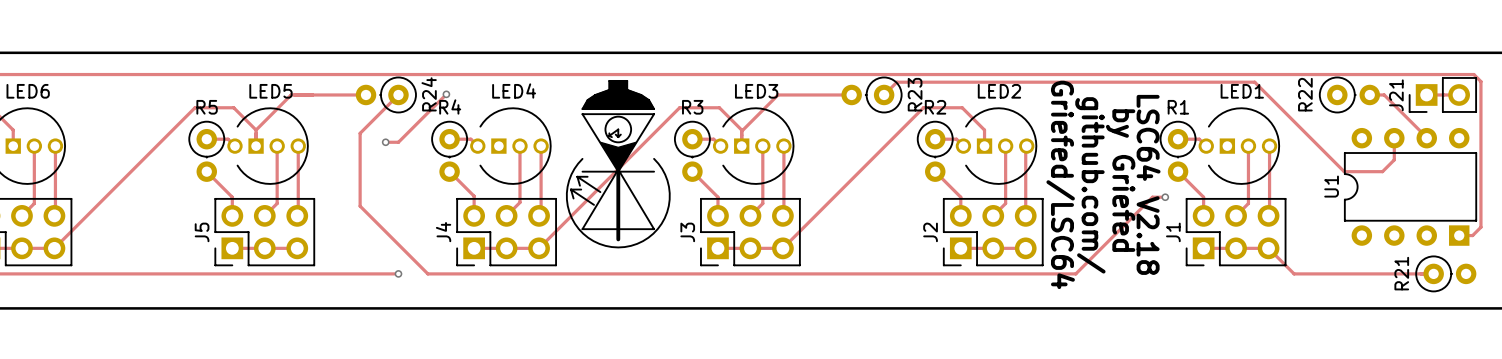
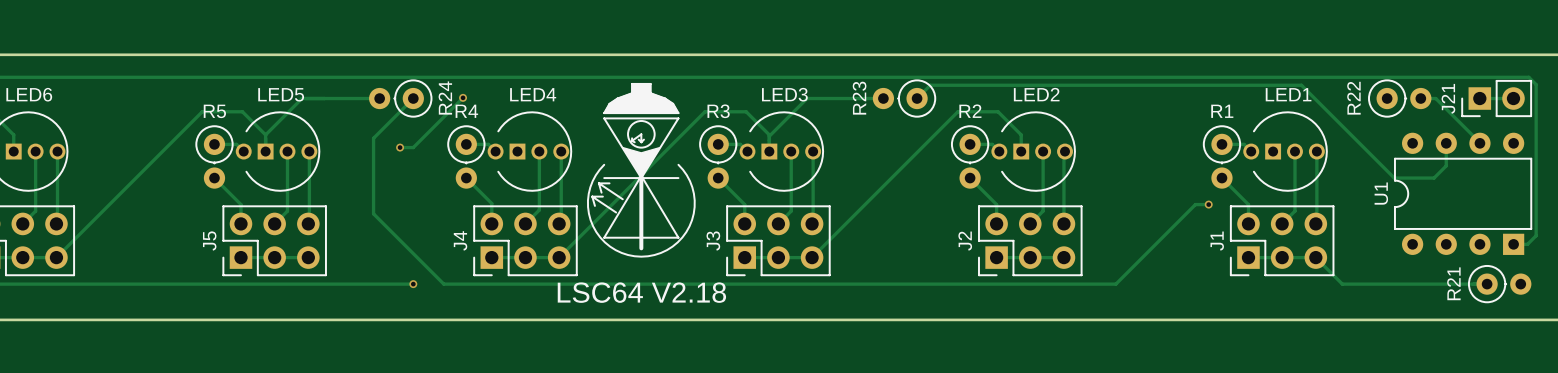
R23 name position: R23 (915, 94) -> R23 (859, 98)
text: by Griefed (1120, 180) -> none
text: Griefed/LSC64 (1060, 184) -> none
text: LSC64 V2.18 (1148, 184) -> none
text: github.com/ (1090, 185) -> none
text: none -> LSC64 V2.18 (641, 292)

